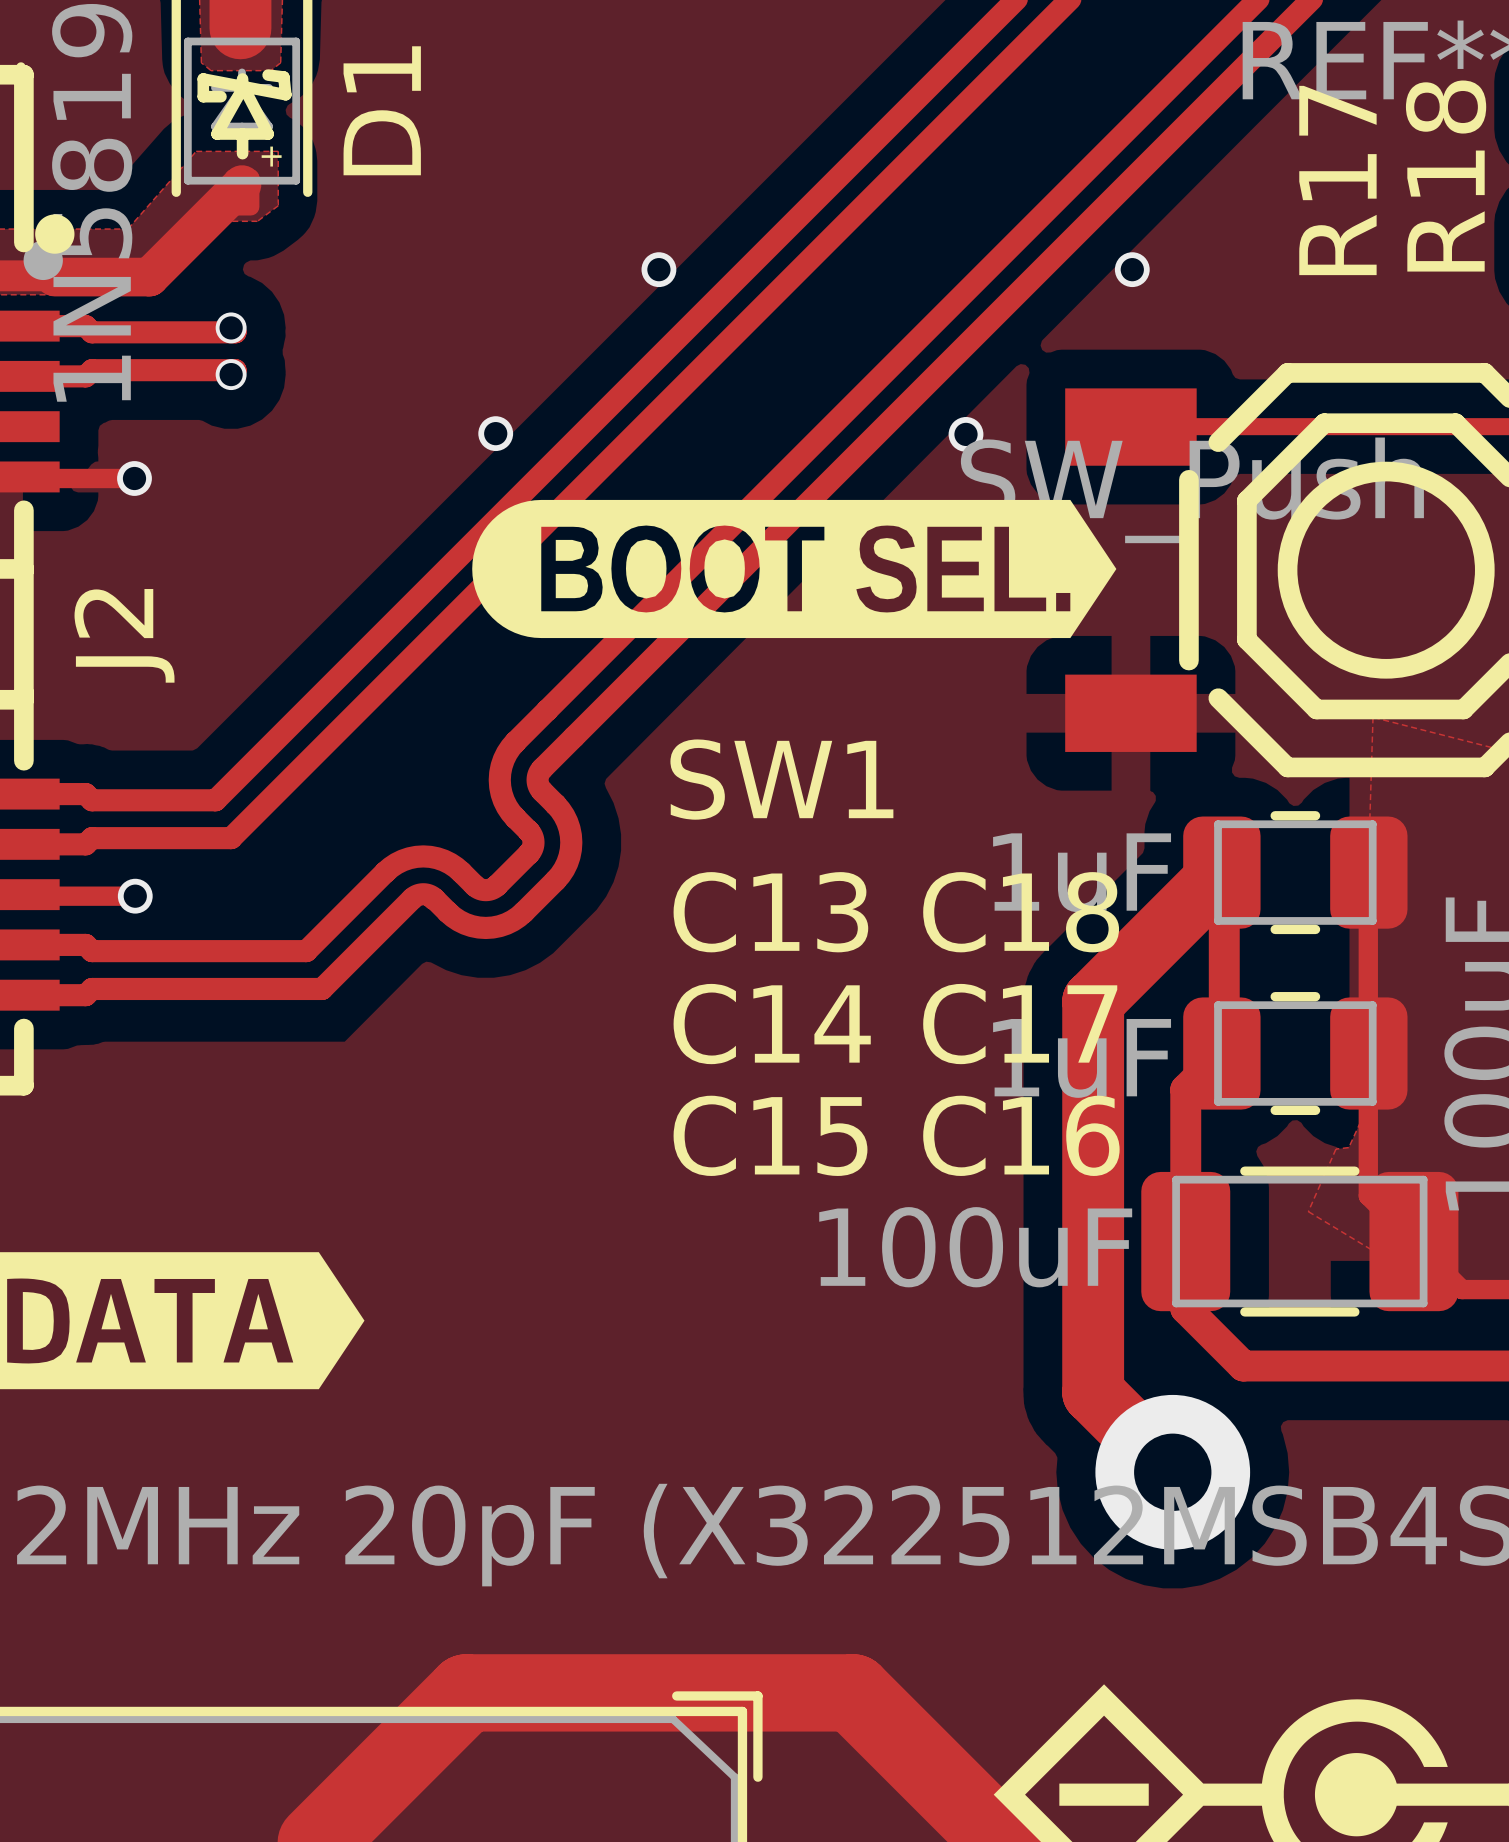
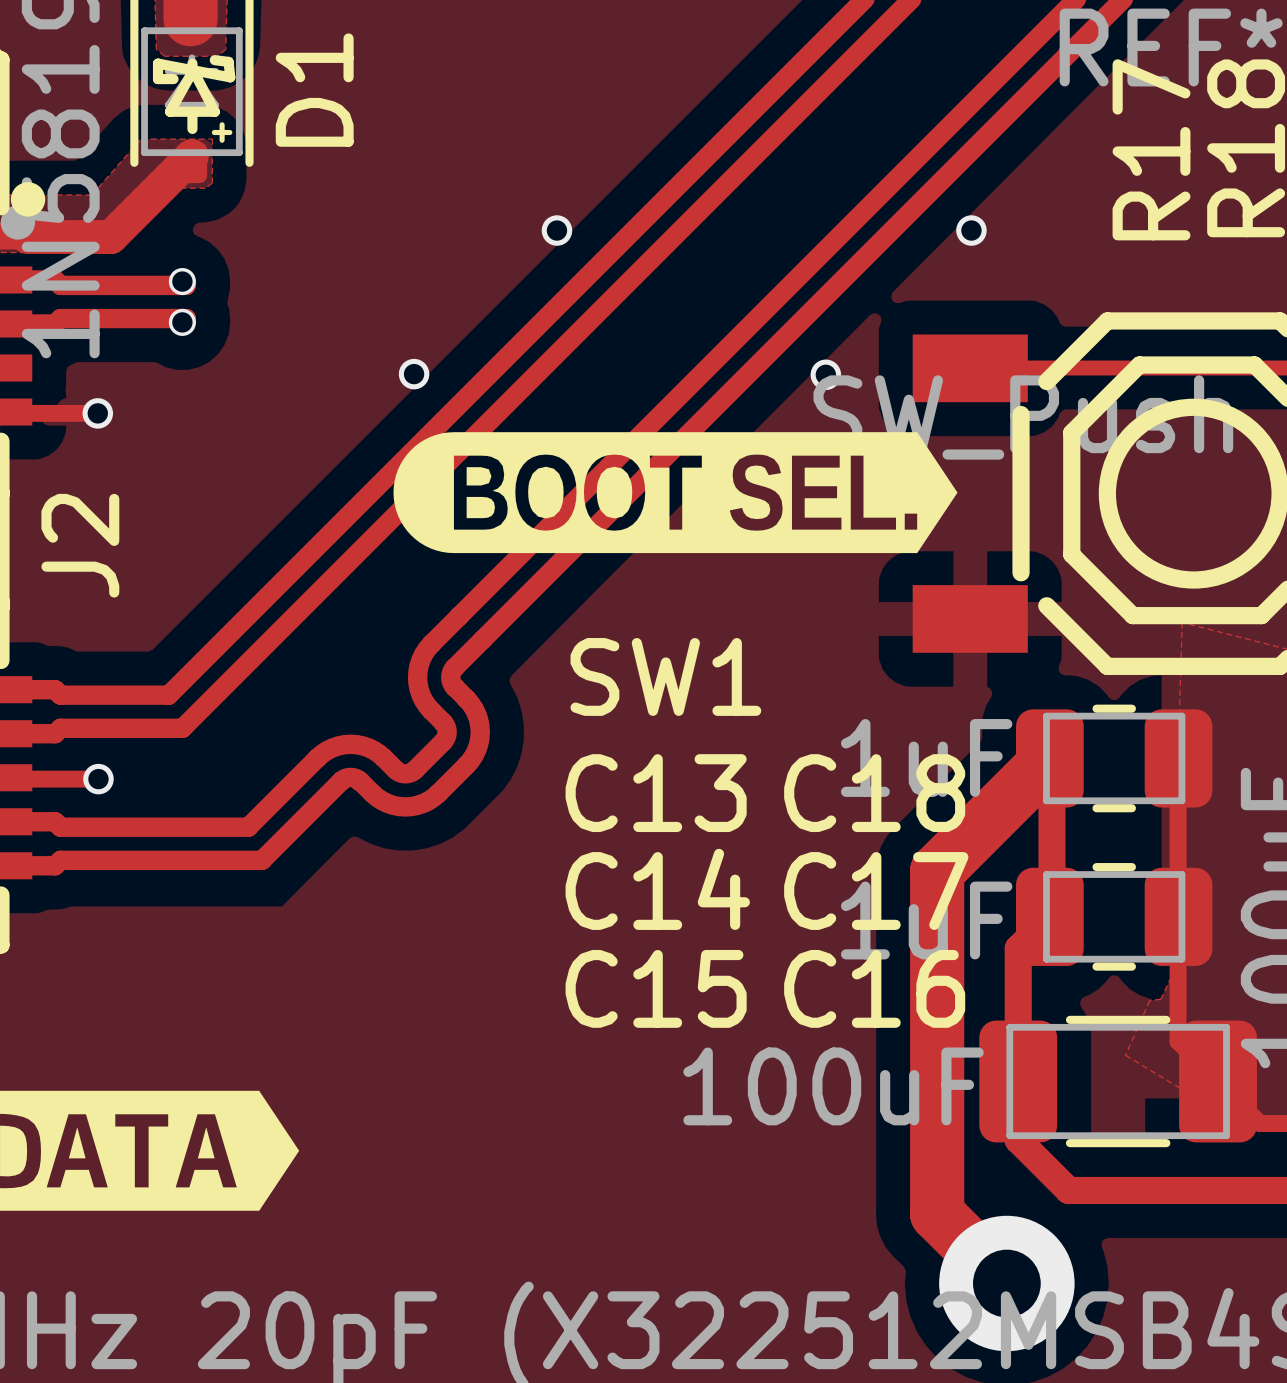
zone outline: (184, 165) (196, 151) (278, 151) (278, 205) (265, 215) -> (141, 139) (212, 139) (212, 183)

